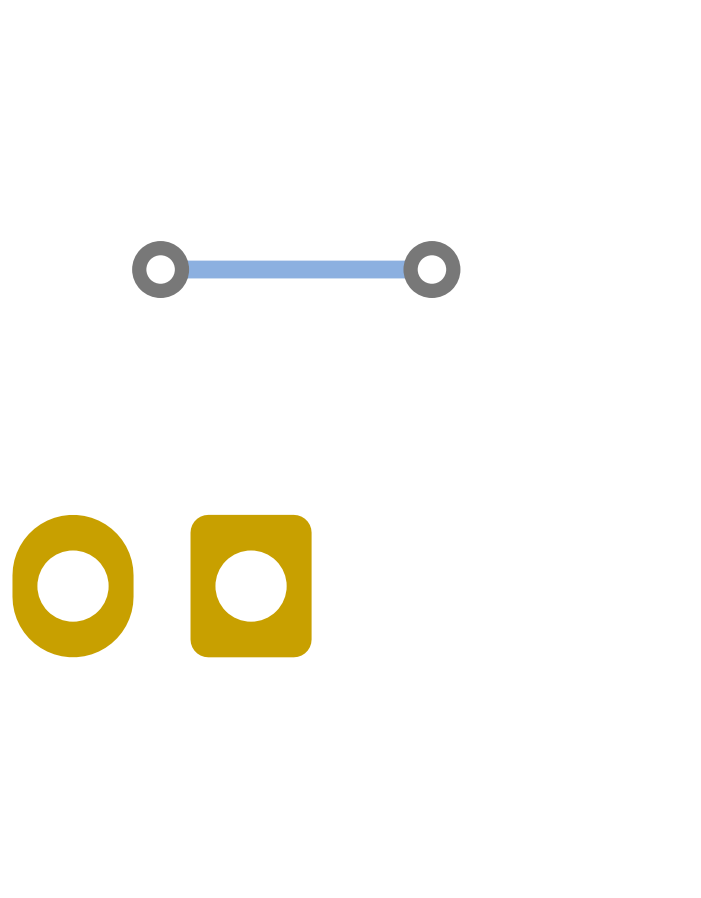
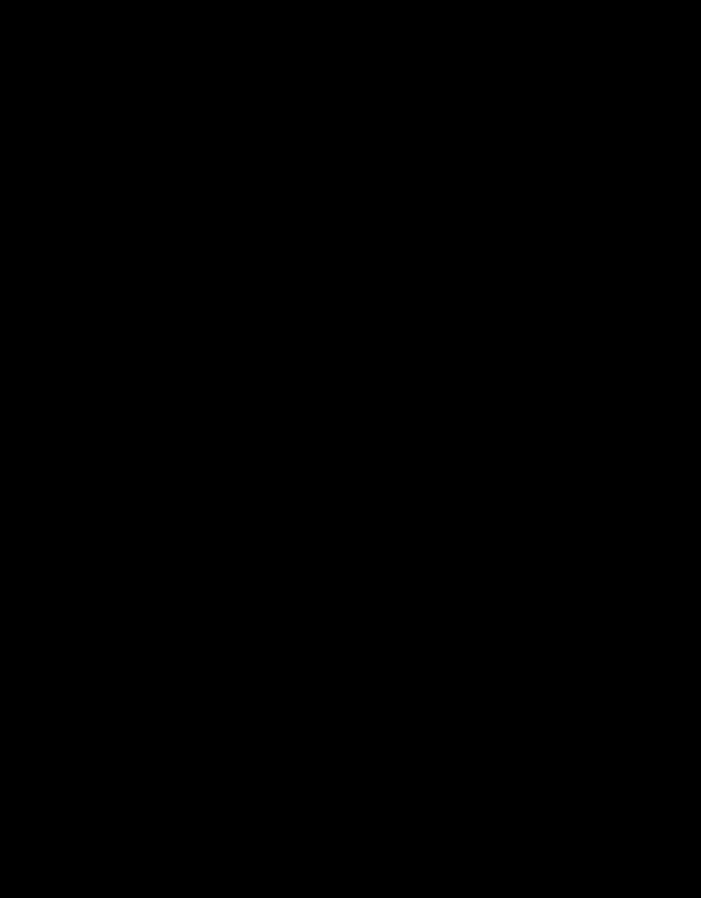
via: (160, 269) -> none
track: (431, 269) (160, 269) -> none
via: (431, 269) -> none
part: (162, 586) -> none

